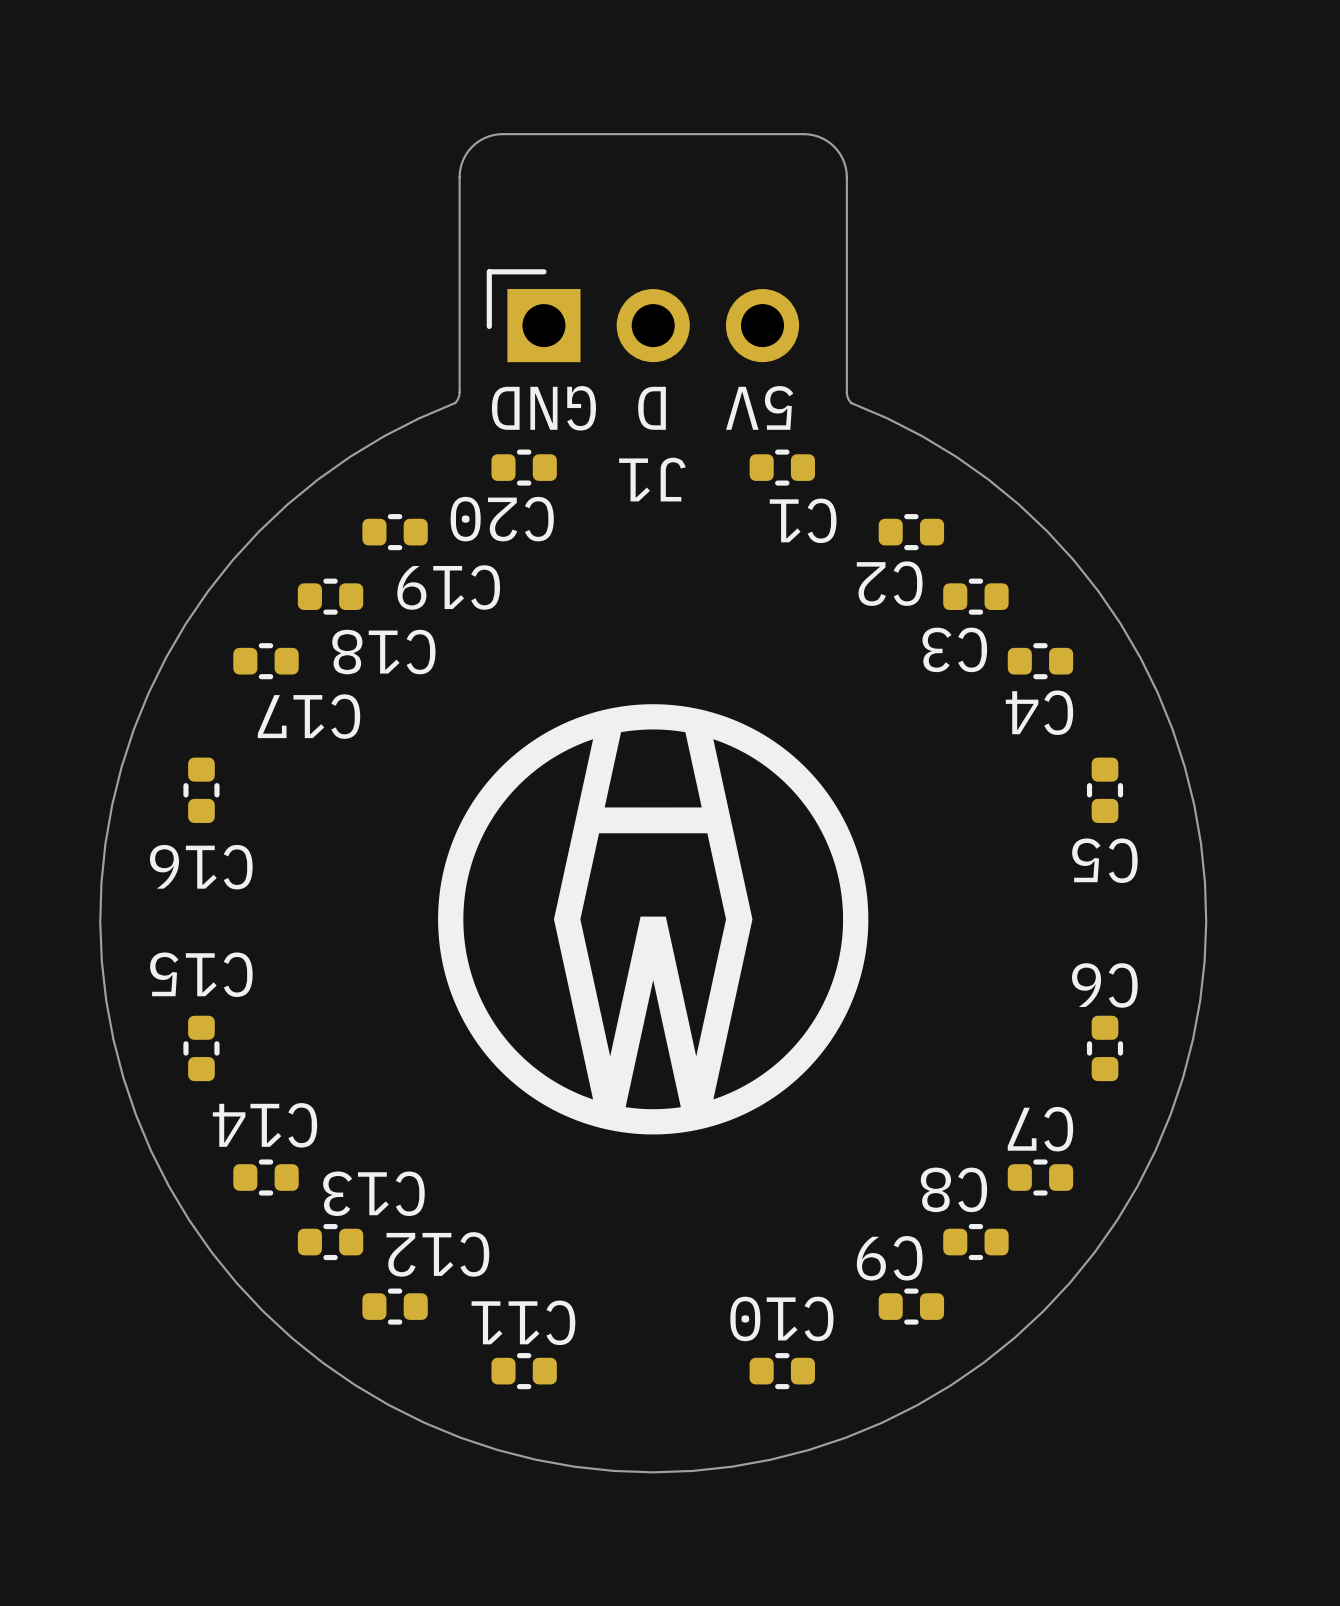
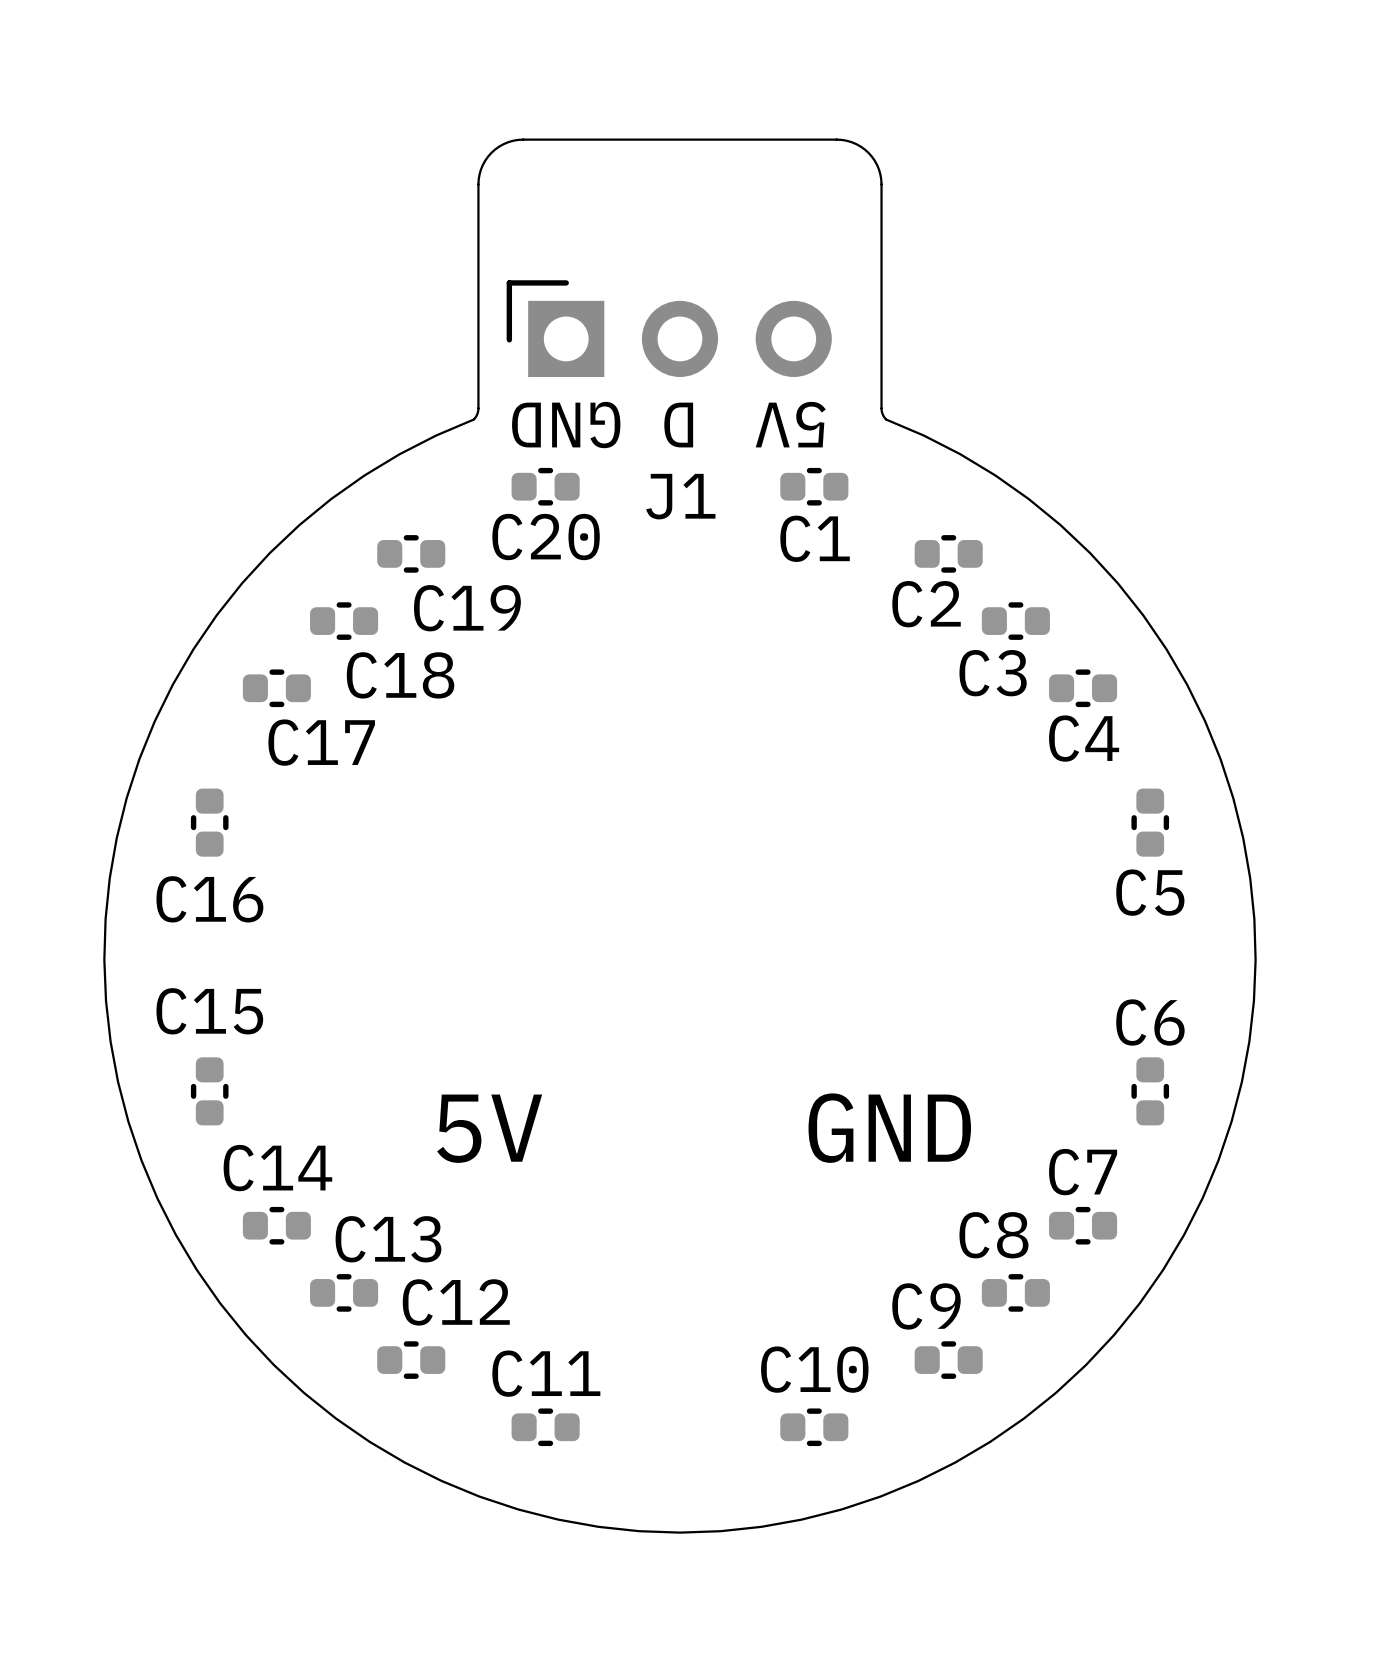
J1 name rotation: 0° (652, 479) -> 180° (680, 496)
C20 name rotation: 0° (502, 519) -> 180° (546, 537)
C1 name rotation: 0° (803, 520) -> 180° (815, 538)
C2 name rotation: 0° (889, 583) -> 180° (926, 604)
C19 name rotation: 0° (448, 587) -> 180° (467, 608)
C3 name rotation: 0° (954, 649) -> 180° (993, 673)
C18 name rotation: 0° (383, 652) -> 180° (400, 675)
drawing: [438, 704, 869, 1135] -> none
C4 name rotation: 0° (1039, 712) -> 180° (1084, 738)
C17 name rotation: 0° (309, 716) -> 180° (321, 742)
C5 name rotation: 0° (1104, 860) -> 180° (1150, 892)
C16 name rotation: 0° (201, 867) -> 180° (209, 899)
C15 name rotation: 0° (201, 974) -> 180° (209, 1011)
C6 name rotation: 0° (1104, 985) -> 180° (1150, 1022)
text: none -> GND (889, 1128)
text: none -> 5V (489, 1128)
C14 name rotation: 0° (265, 1125) -> 180° (277, 1168)
C7 name rotation: 0° (1040, 1129) -> 180° (1083, 1172)
C8 name rotation: 0° (953, 1189) -> 180° (993, 1235)
C13 name rotation: 0° (373, 1193) -> 180° (388, 1239)
C12 name rotation: 0° (437, 1254) -> 180° (456, 1302)
C9 name rotation: 0° (889, 1258) -> 180° (926, 1306)
C10 name rotation: 0° (781, 1318) -> 180° (814, 1369)
C11 name rotation: 0° (523, 1322) -> 180° (546, 1373)

